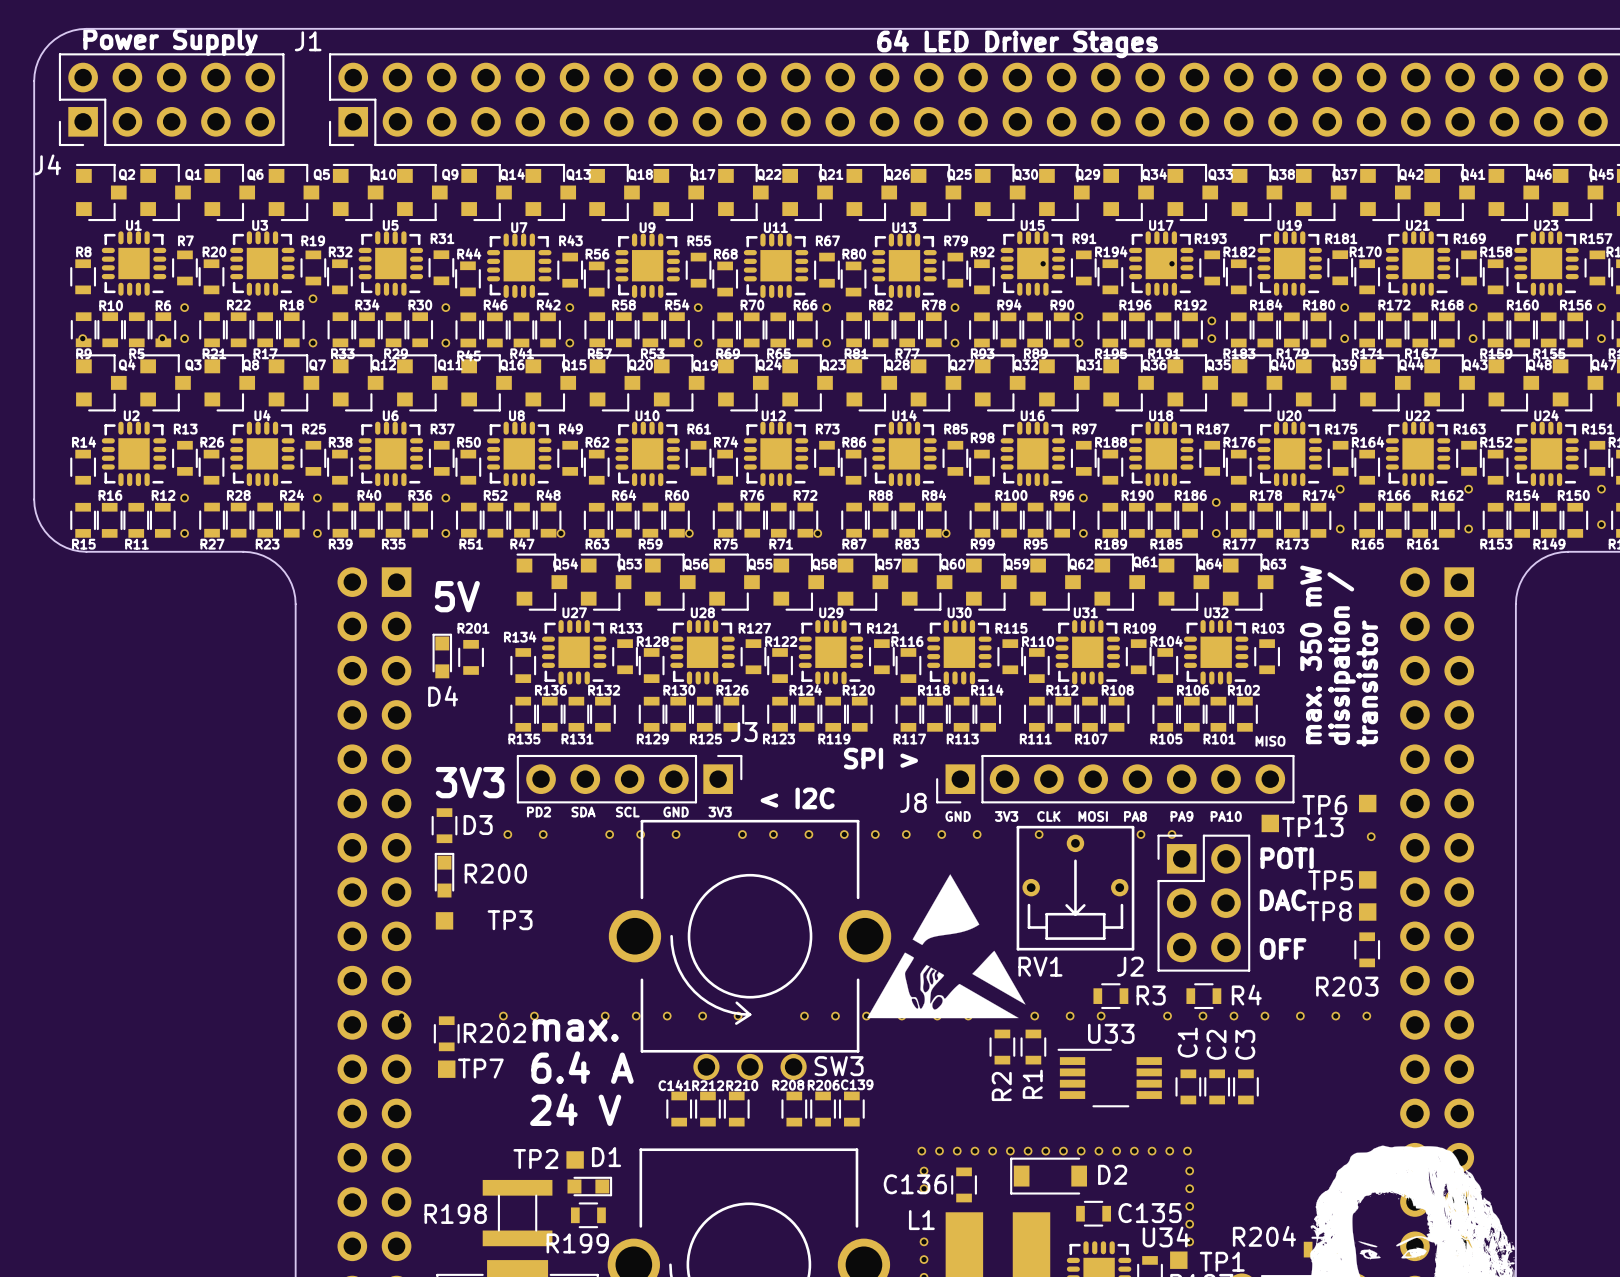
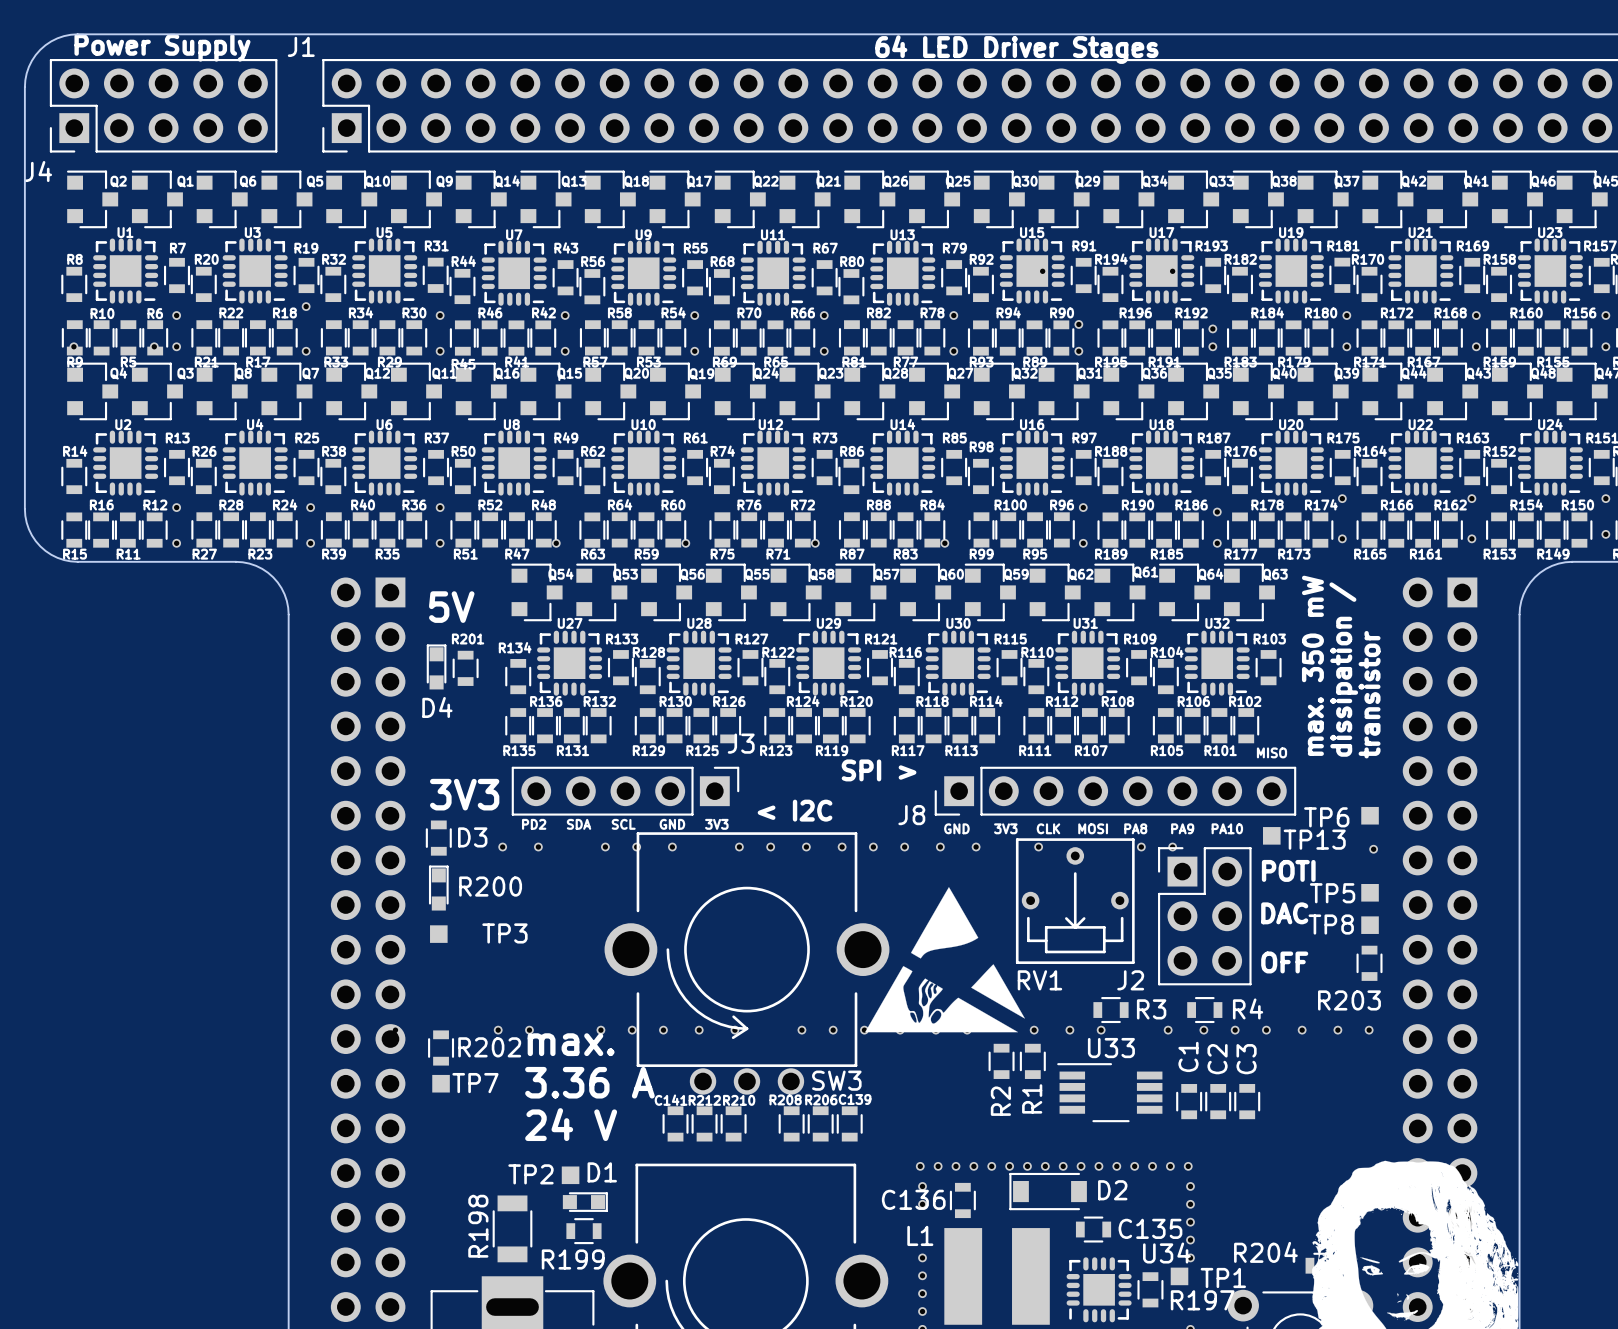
text: 6.4 A (582, 1067) -> 3.36 A (589, 1082)
R198 footprint: [482, 1179, 553, 1247] -> [492, 1195, 533, 1263]

